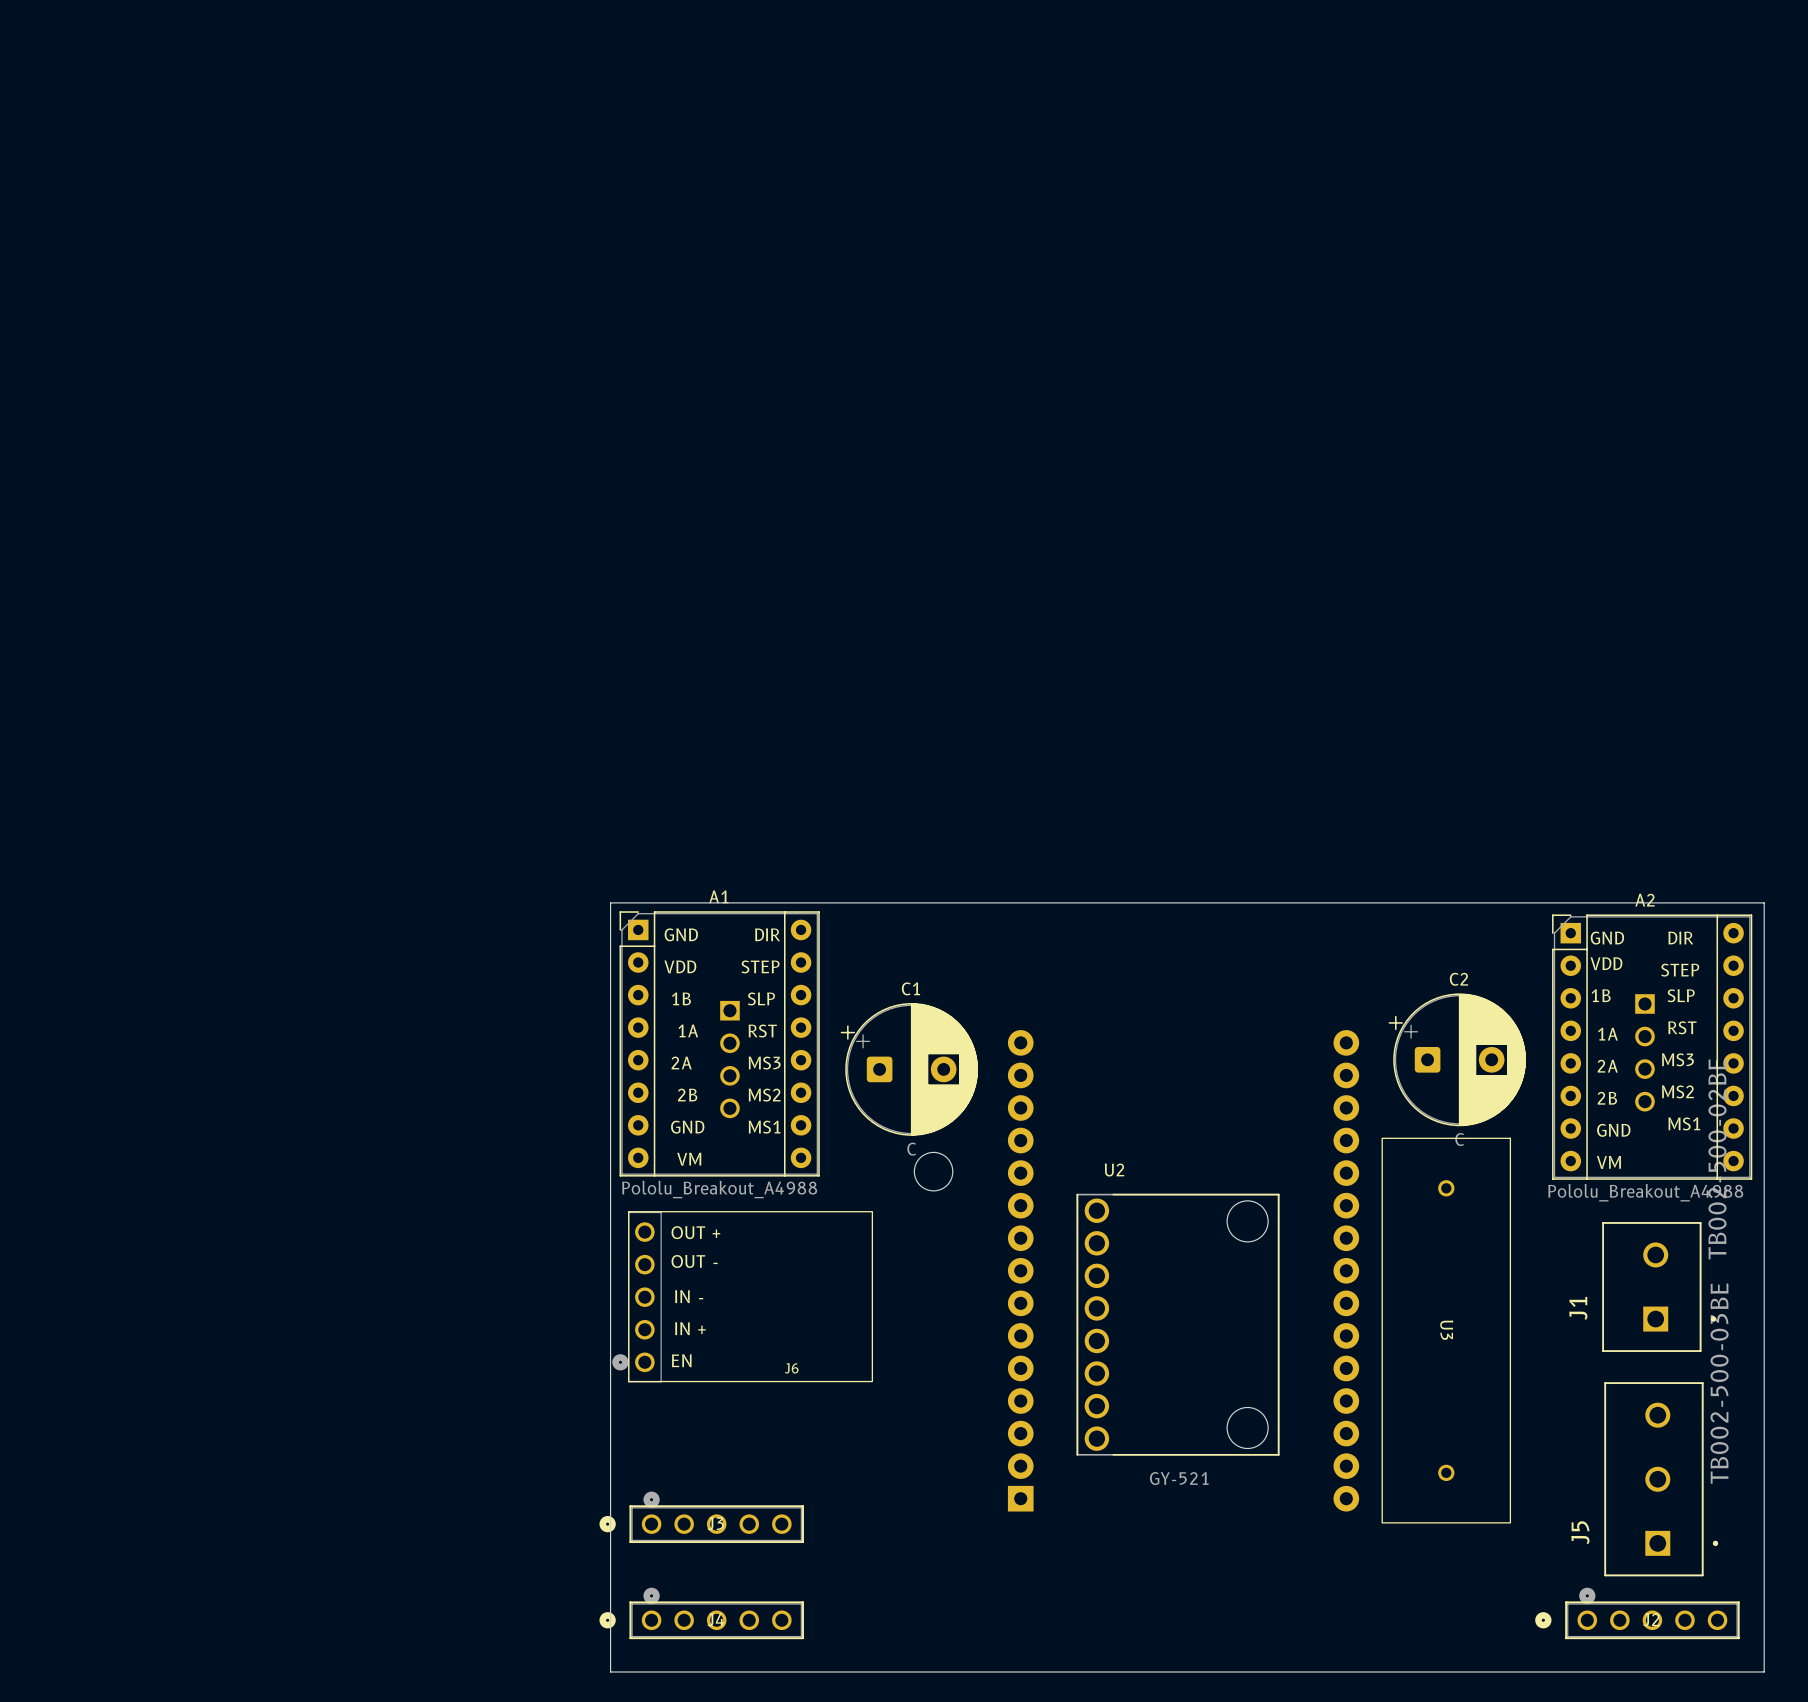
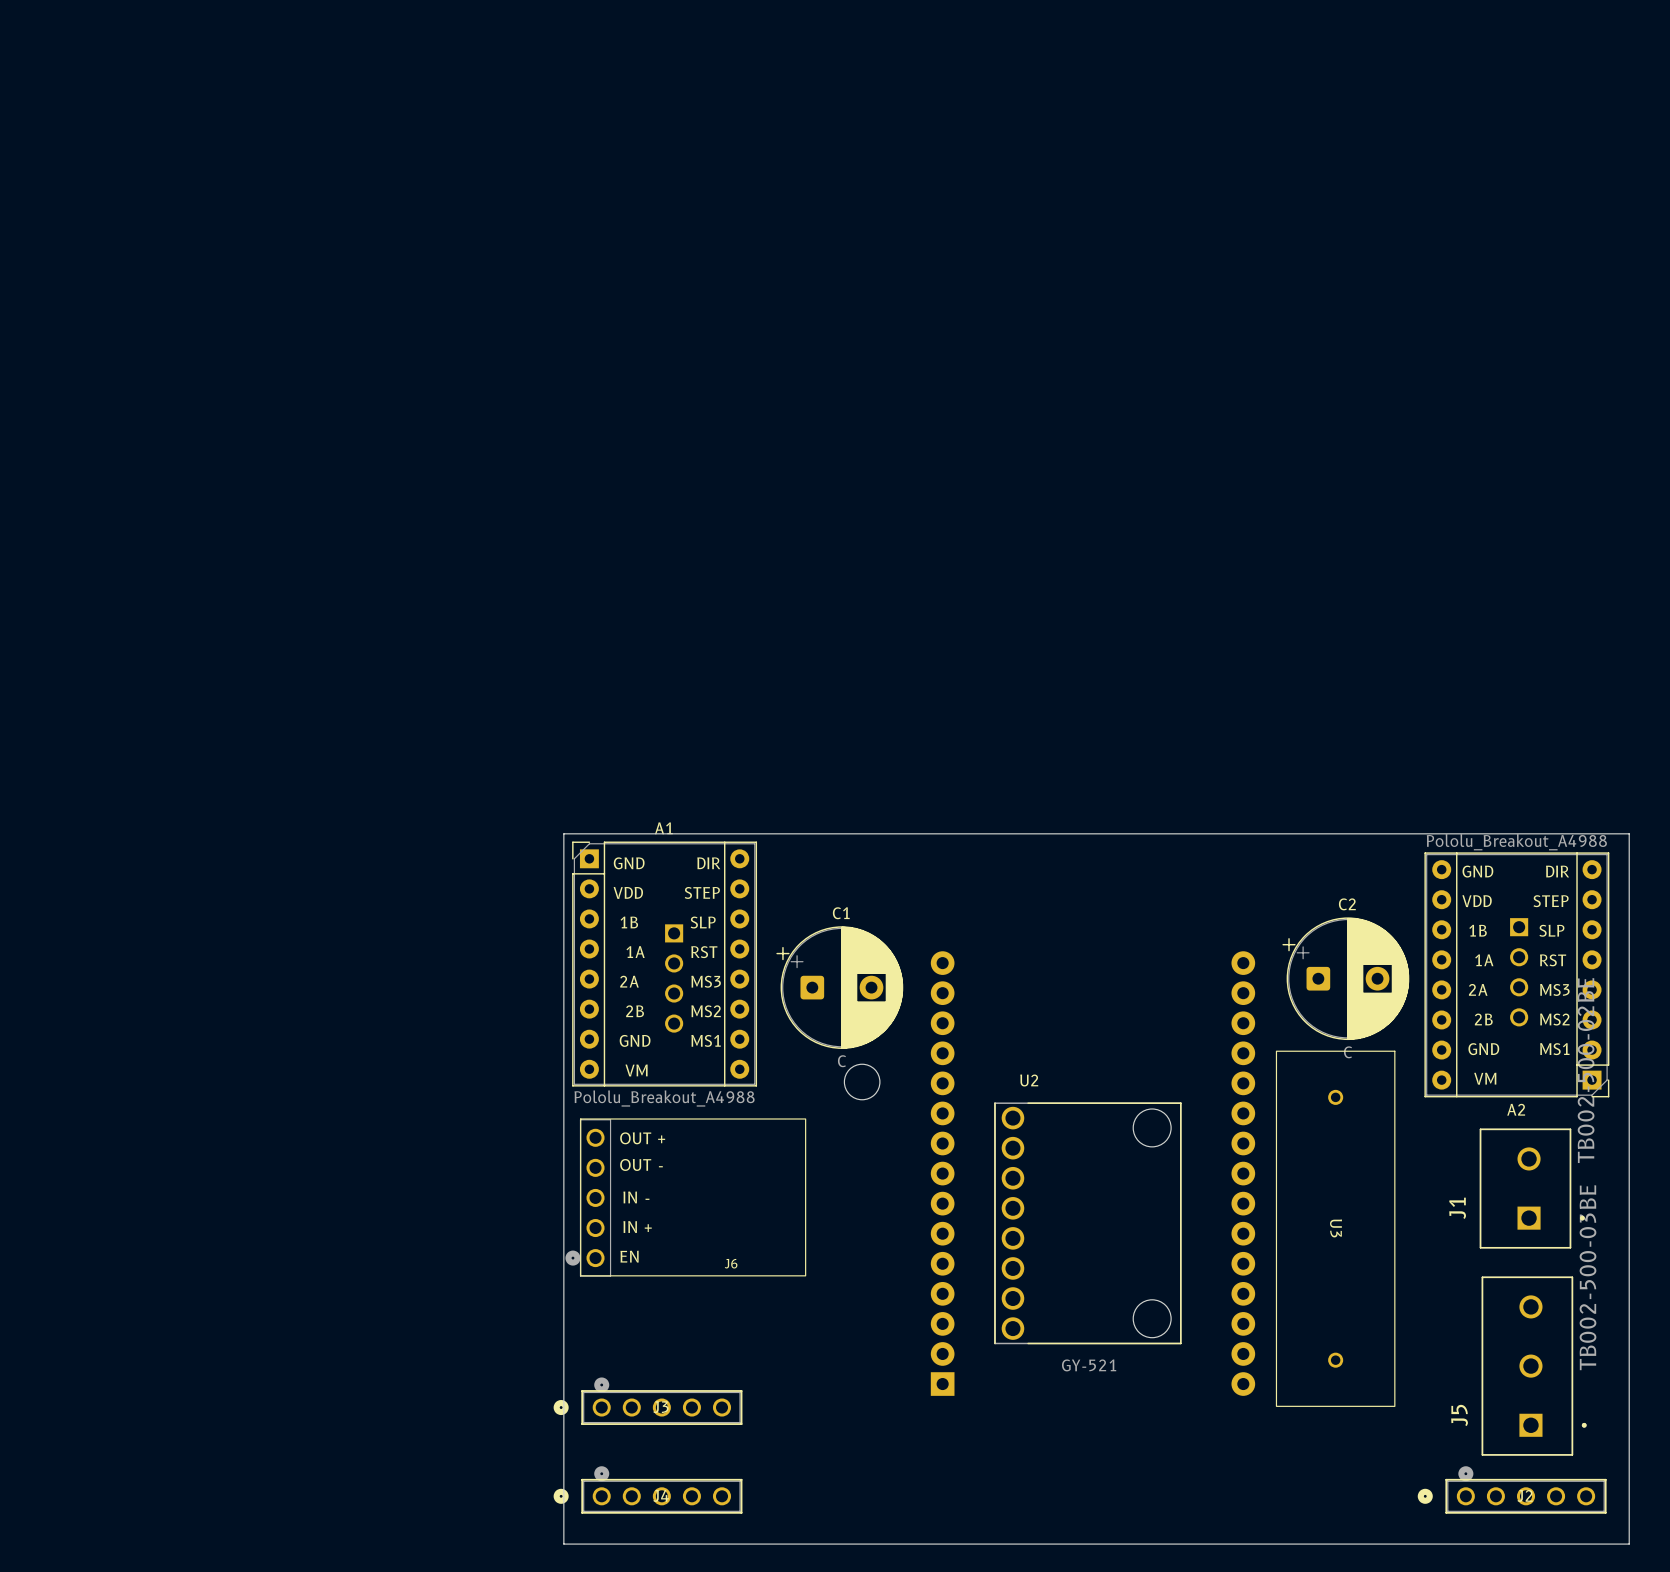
A2 name position: A2 (1644, 900) -> A2 (1516, 1109)
A2 footprint: [1552, 914, 1753, 1180] -> [1424, 852, 1610, 1098]
A2 value position: Pololu_Breakout_A4988 (1645, 1192) -> Pololu_Breakout_A4988 (1516, 842)

